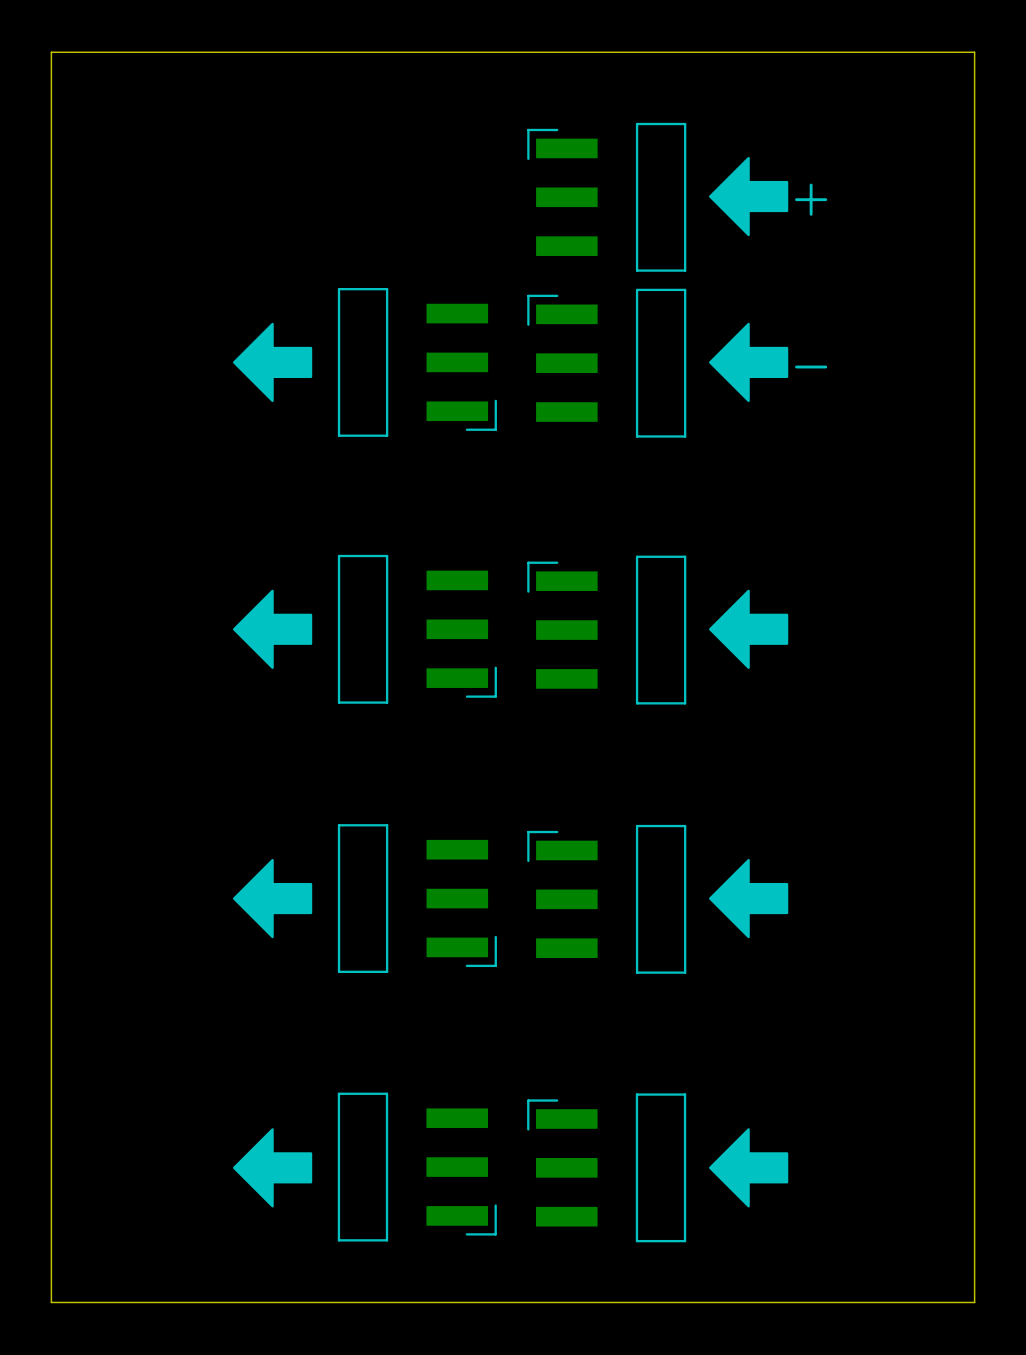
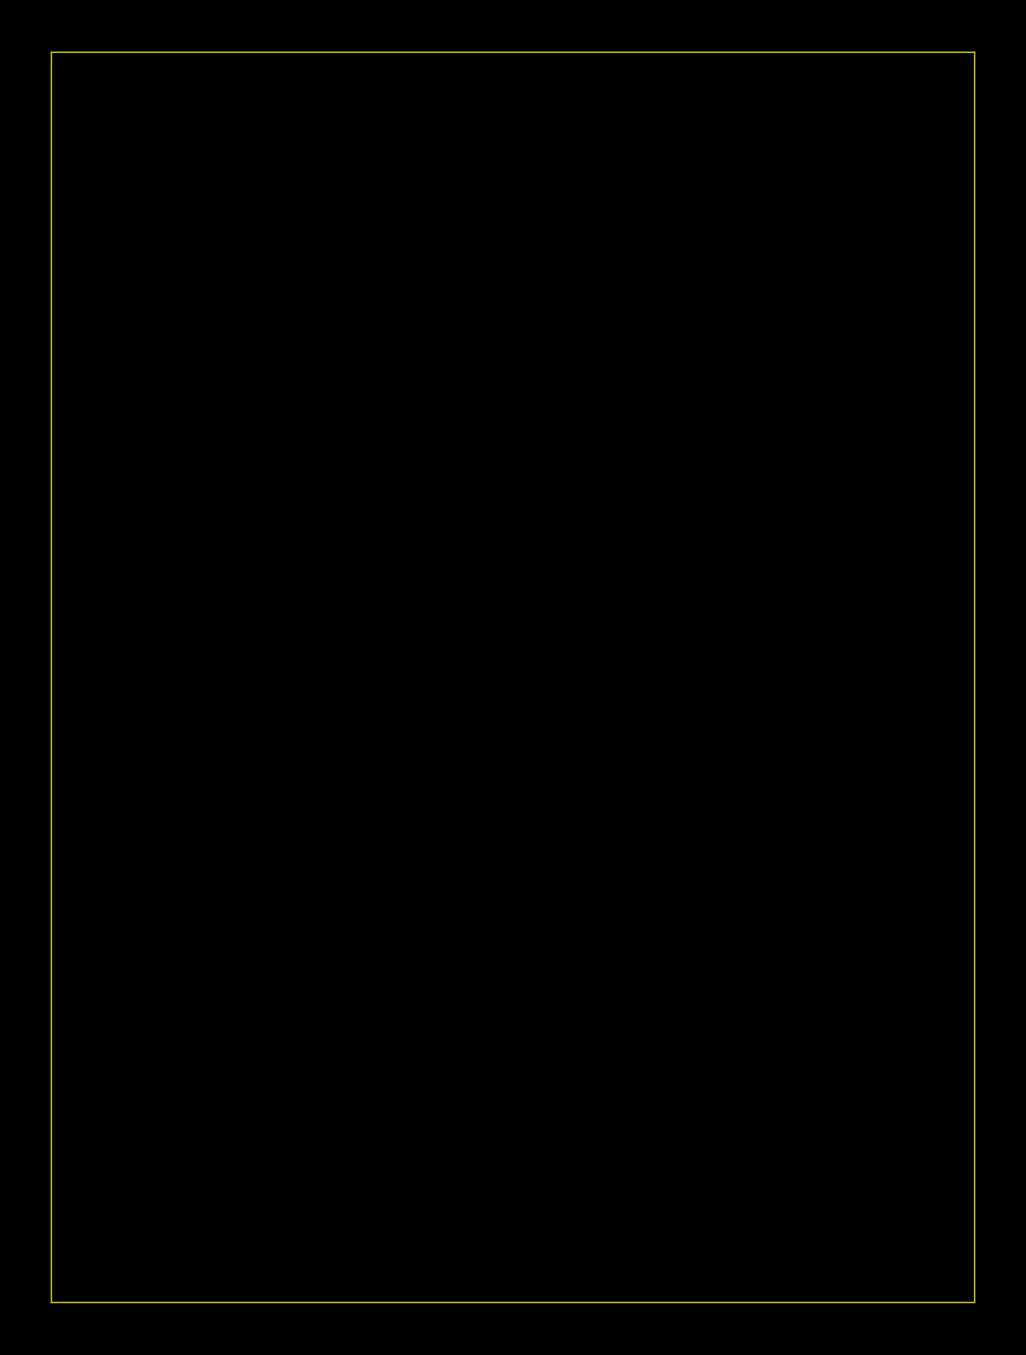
drawing: [708, 156, 789, 237] -> none
part: (606, 197) -> none
text: + (811, 199) -> none
drawing: [232, 322, 313, 403] -> none
drawing: [708, 322, 789, 403] -> none
part: (417, 362) -> none
part: (606, 363) -> none
text: - (811, 367) -> none
drawing: [232, 589, 313, 669] -> none
drawing: [708, 589, 789, 669] -> none
part: (417, 629) -> none
part: (606, 630) -> none
drawing: [232, 858, 313, 939] -> none
drawing: [708, 858, 789, 939] -> none
part: (417, 898) -> none
part: (606, 899) -> none
drawing: [232, 1128, 313, 1208] -> none
drawing: [708, 1128, 789, 1208] -> none
part: (417, 1167) -> none
part: (606, 1167) -> none

